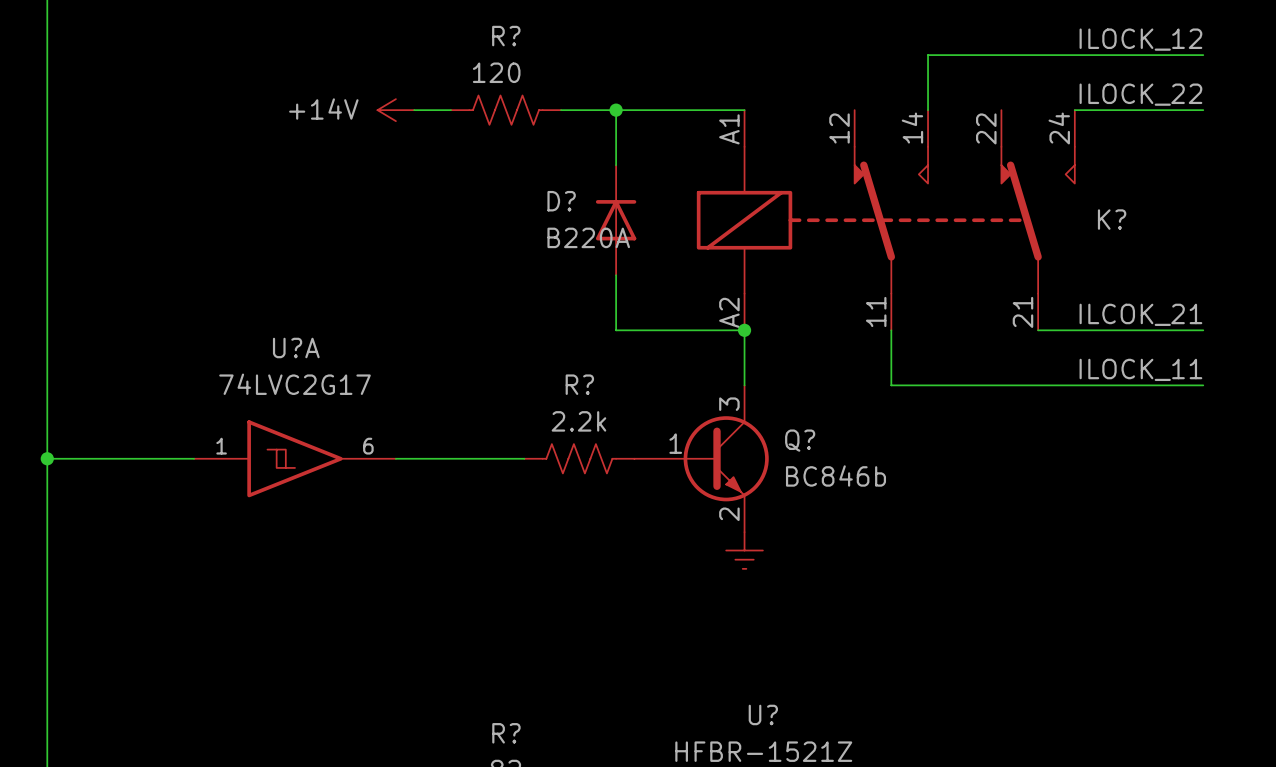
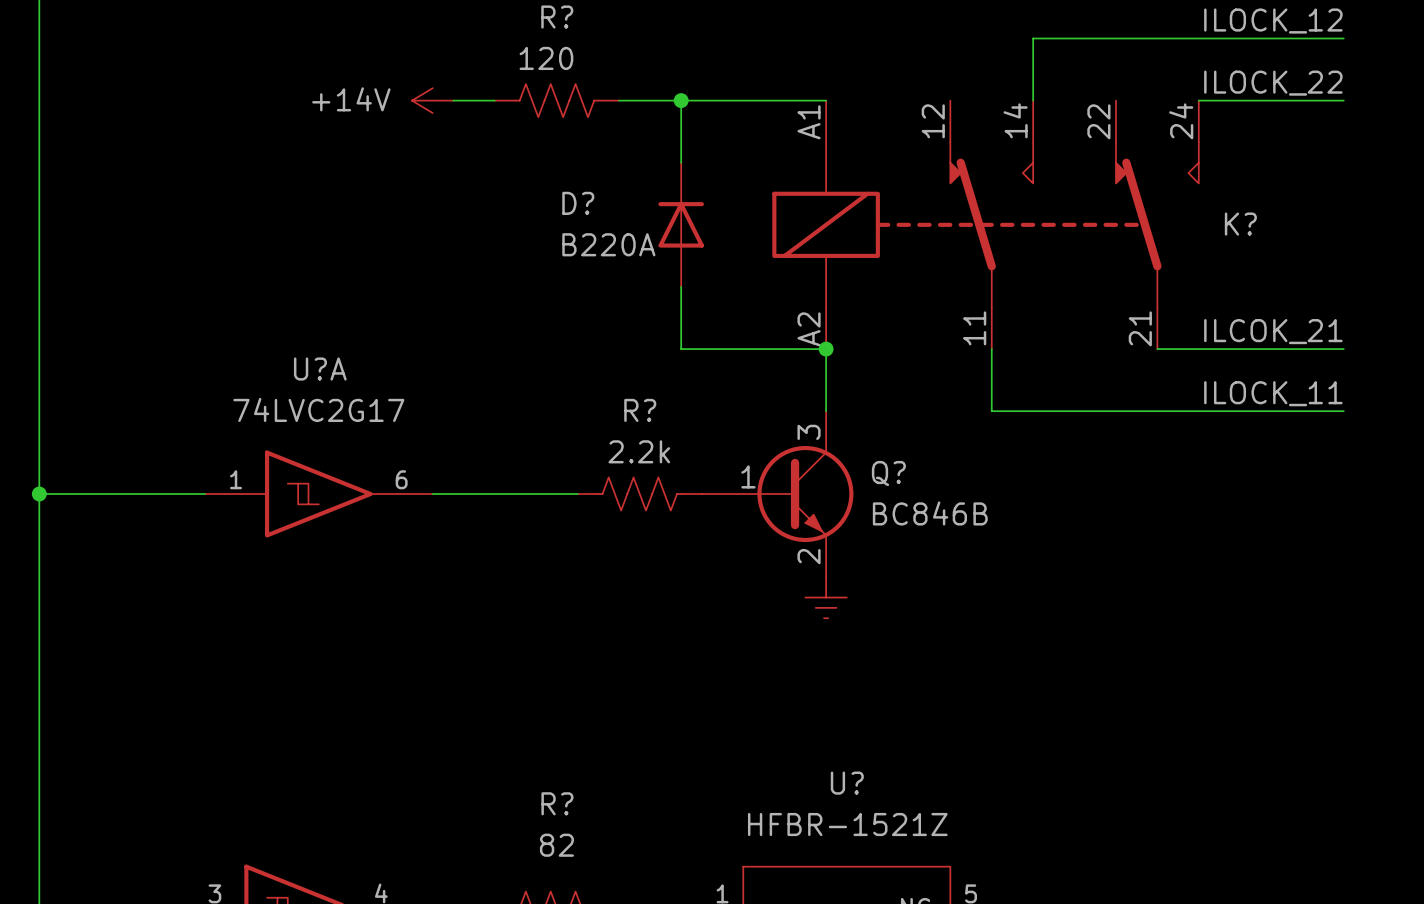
D? name position: D? (561, 201) -> D? (578, 203)
D? value position: B220A (588, 237) -> B220A (608, 244)
Q? value: BC846b (835, 475) -> BC846B (930, 513)

